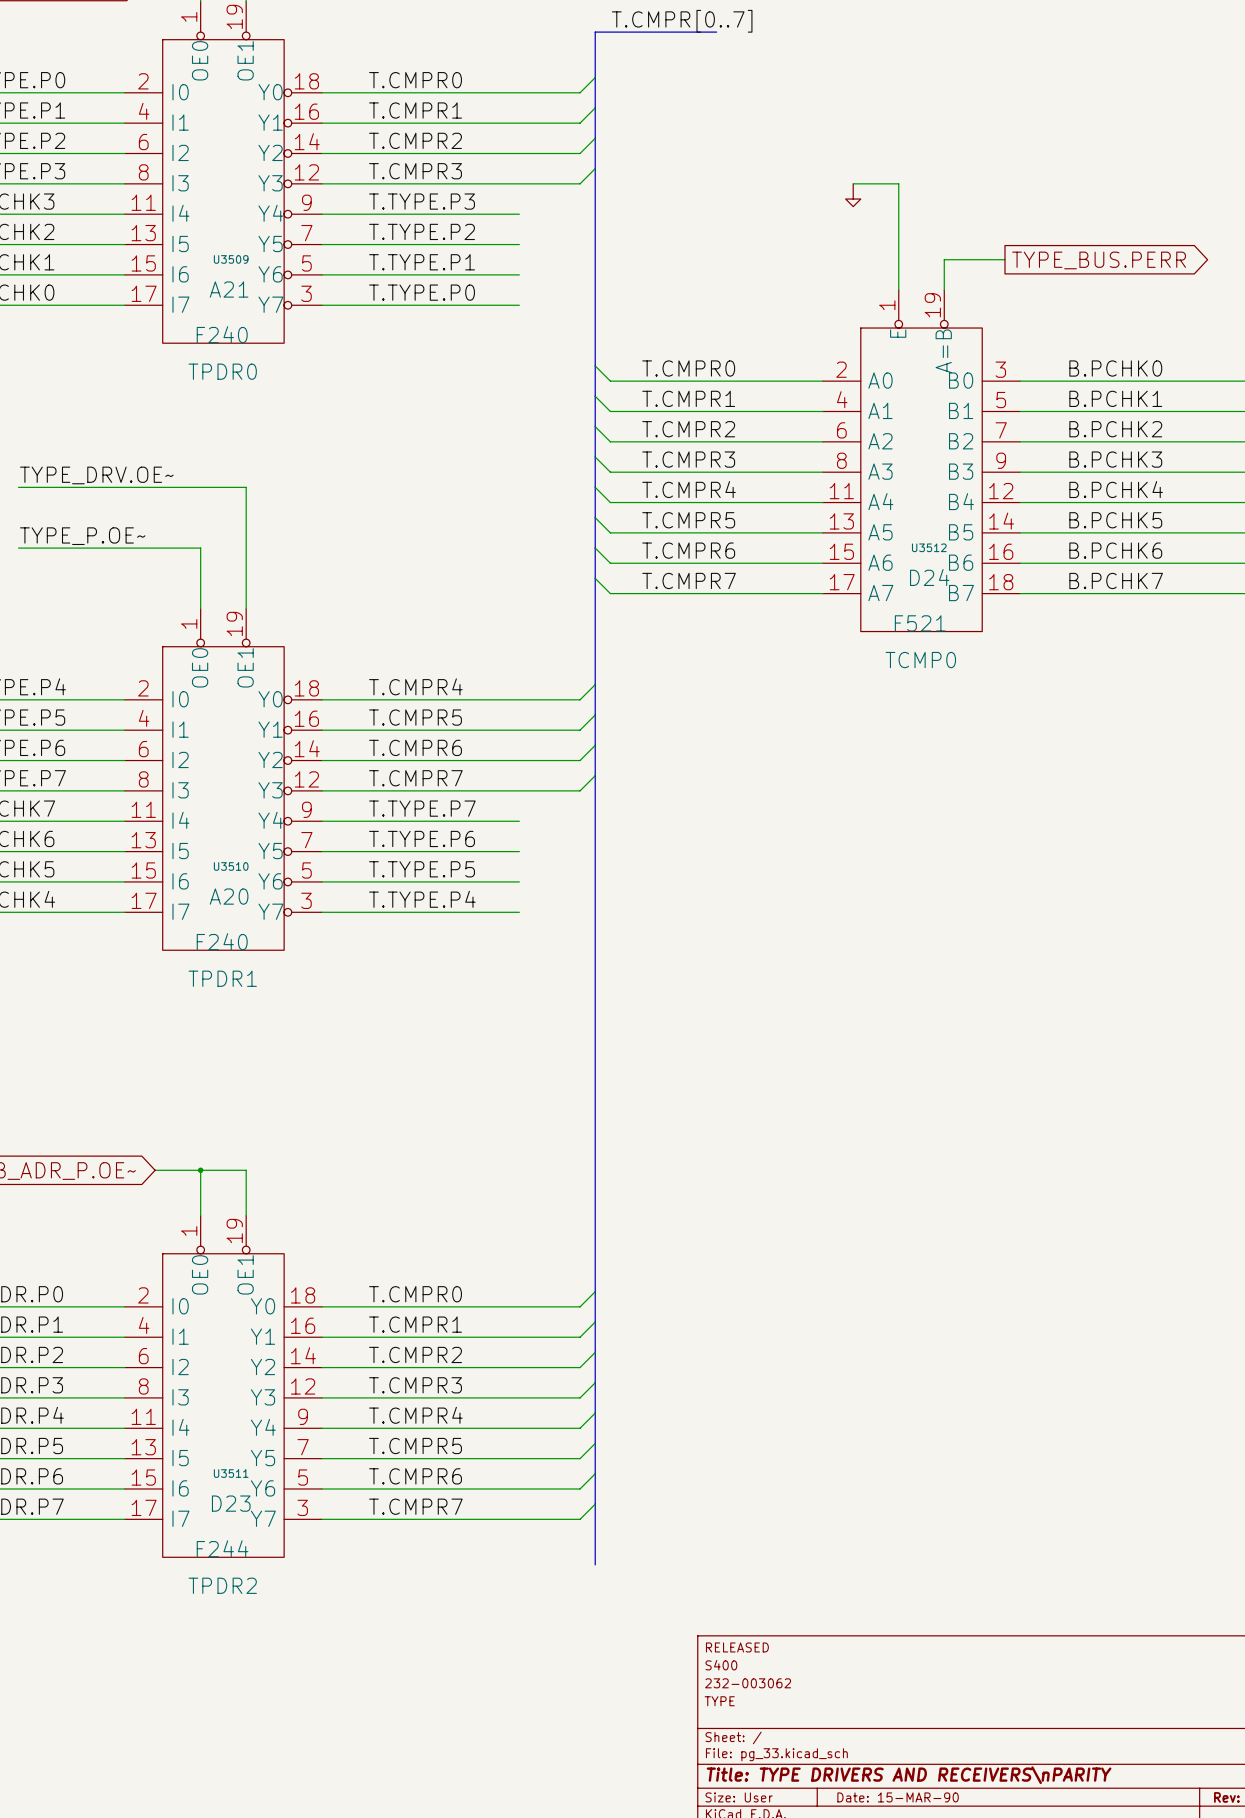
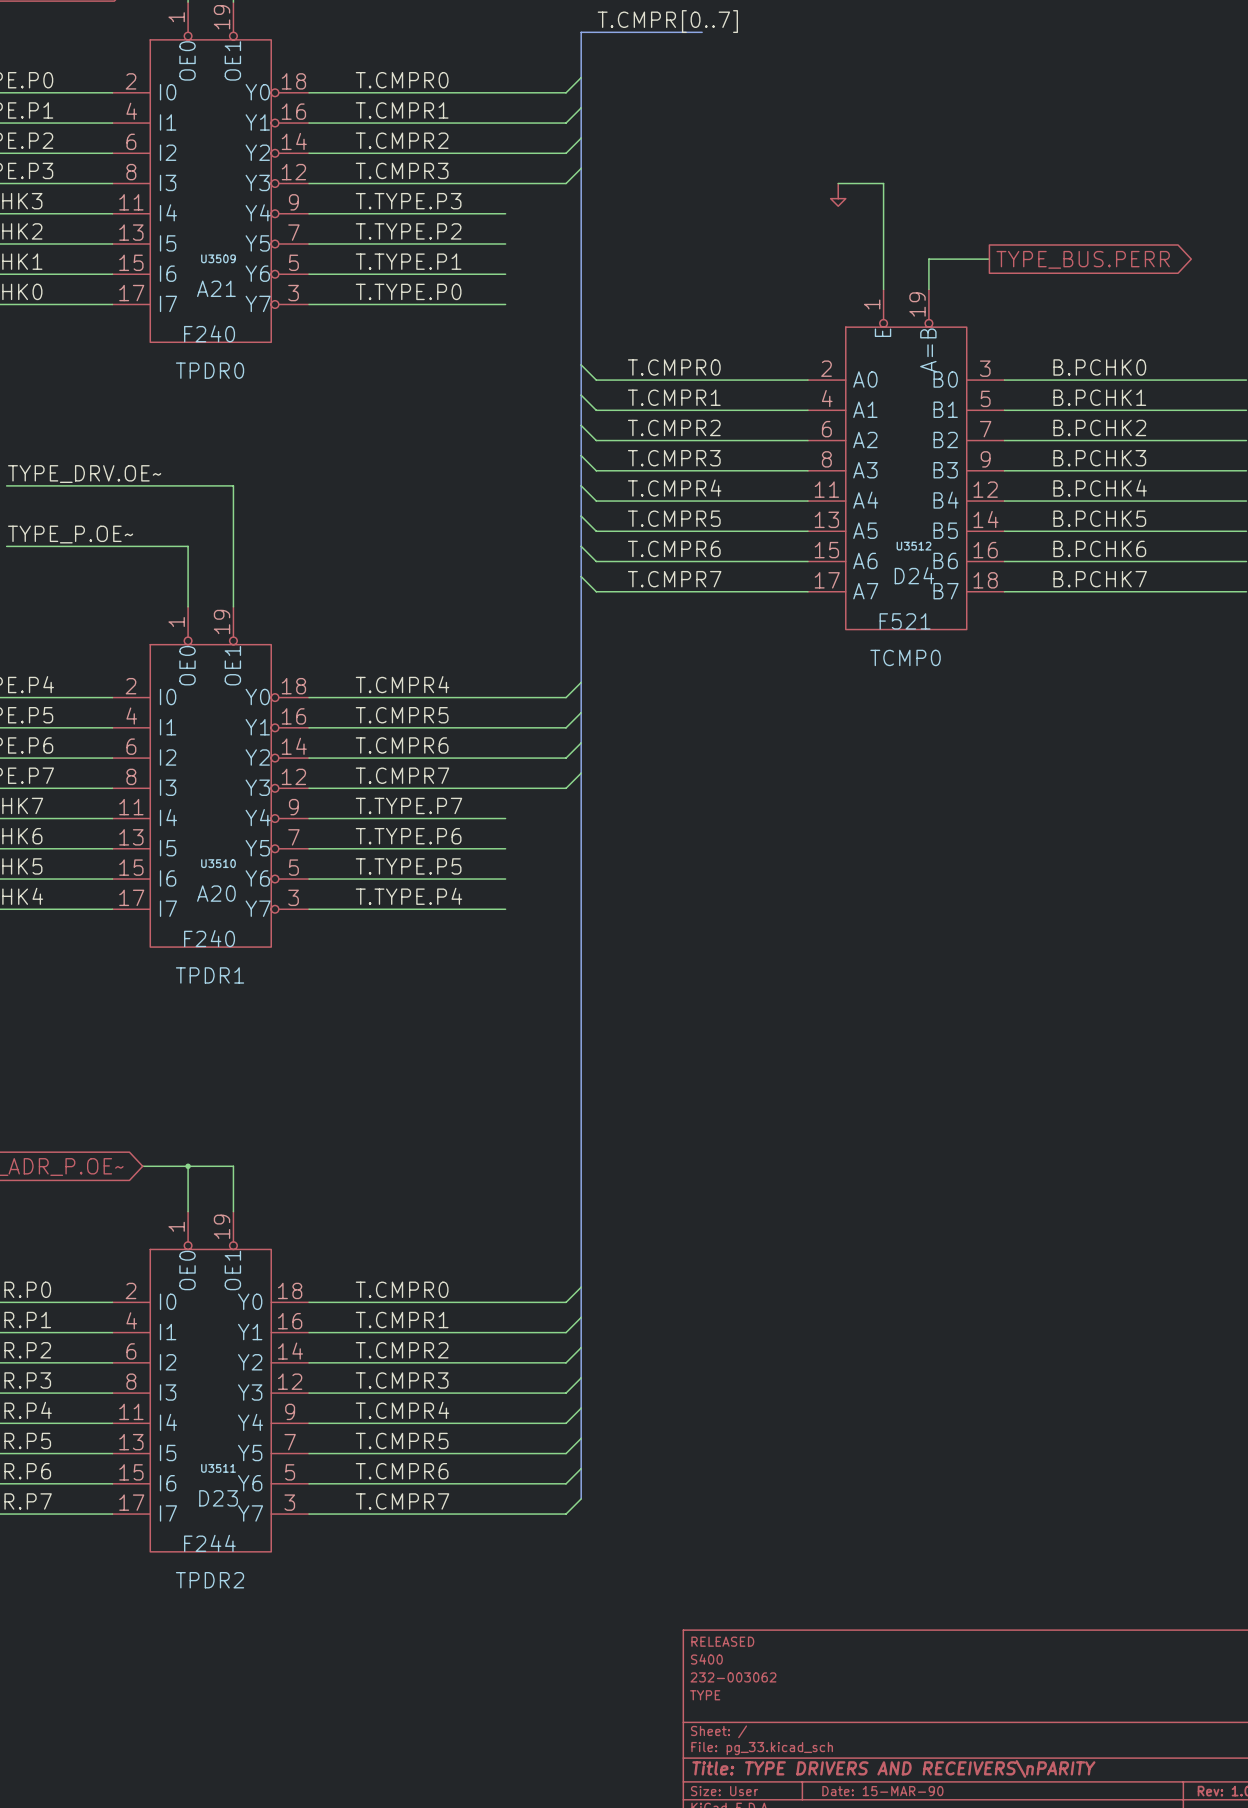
bus: (595, 1504) (595, 1564) -> none

